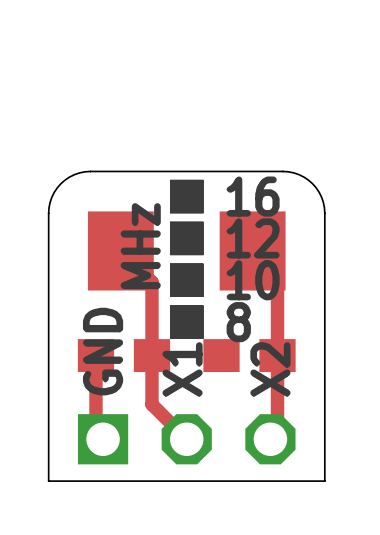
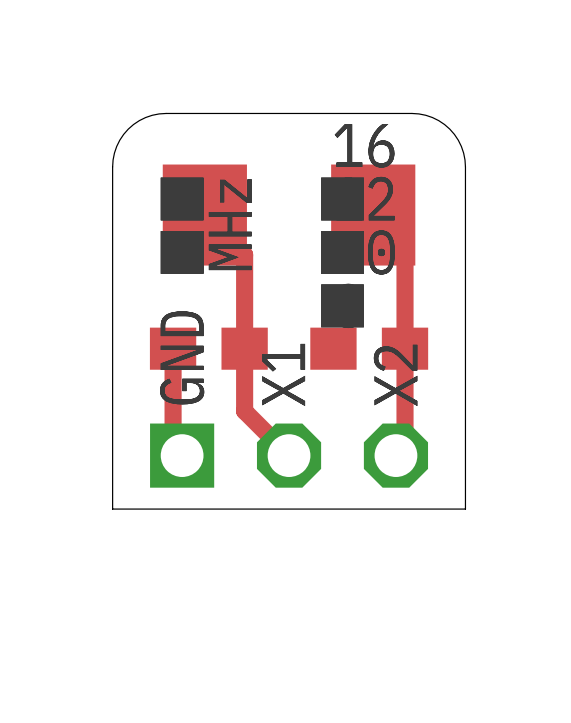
drawing: [170, 179, 204, 339] -> none
drawing: none -> [160, 177, 204, 274]
drawing: none -> [321, 177, 364, 328]

